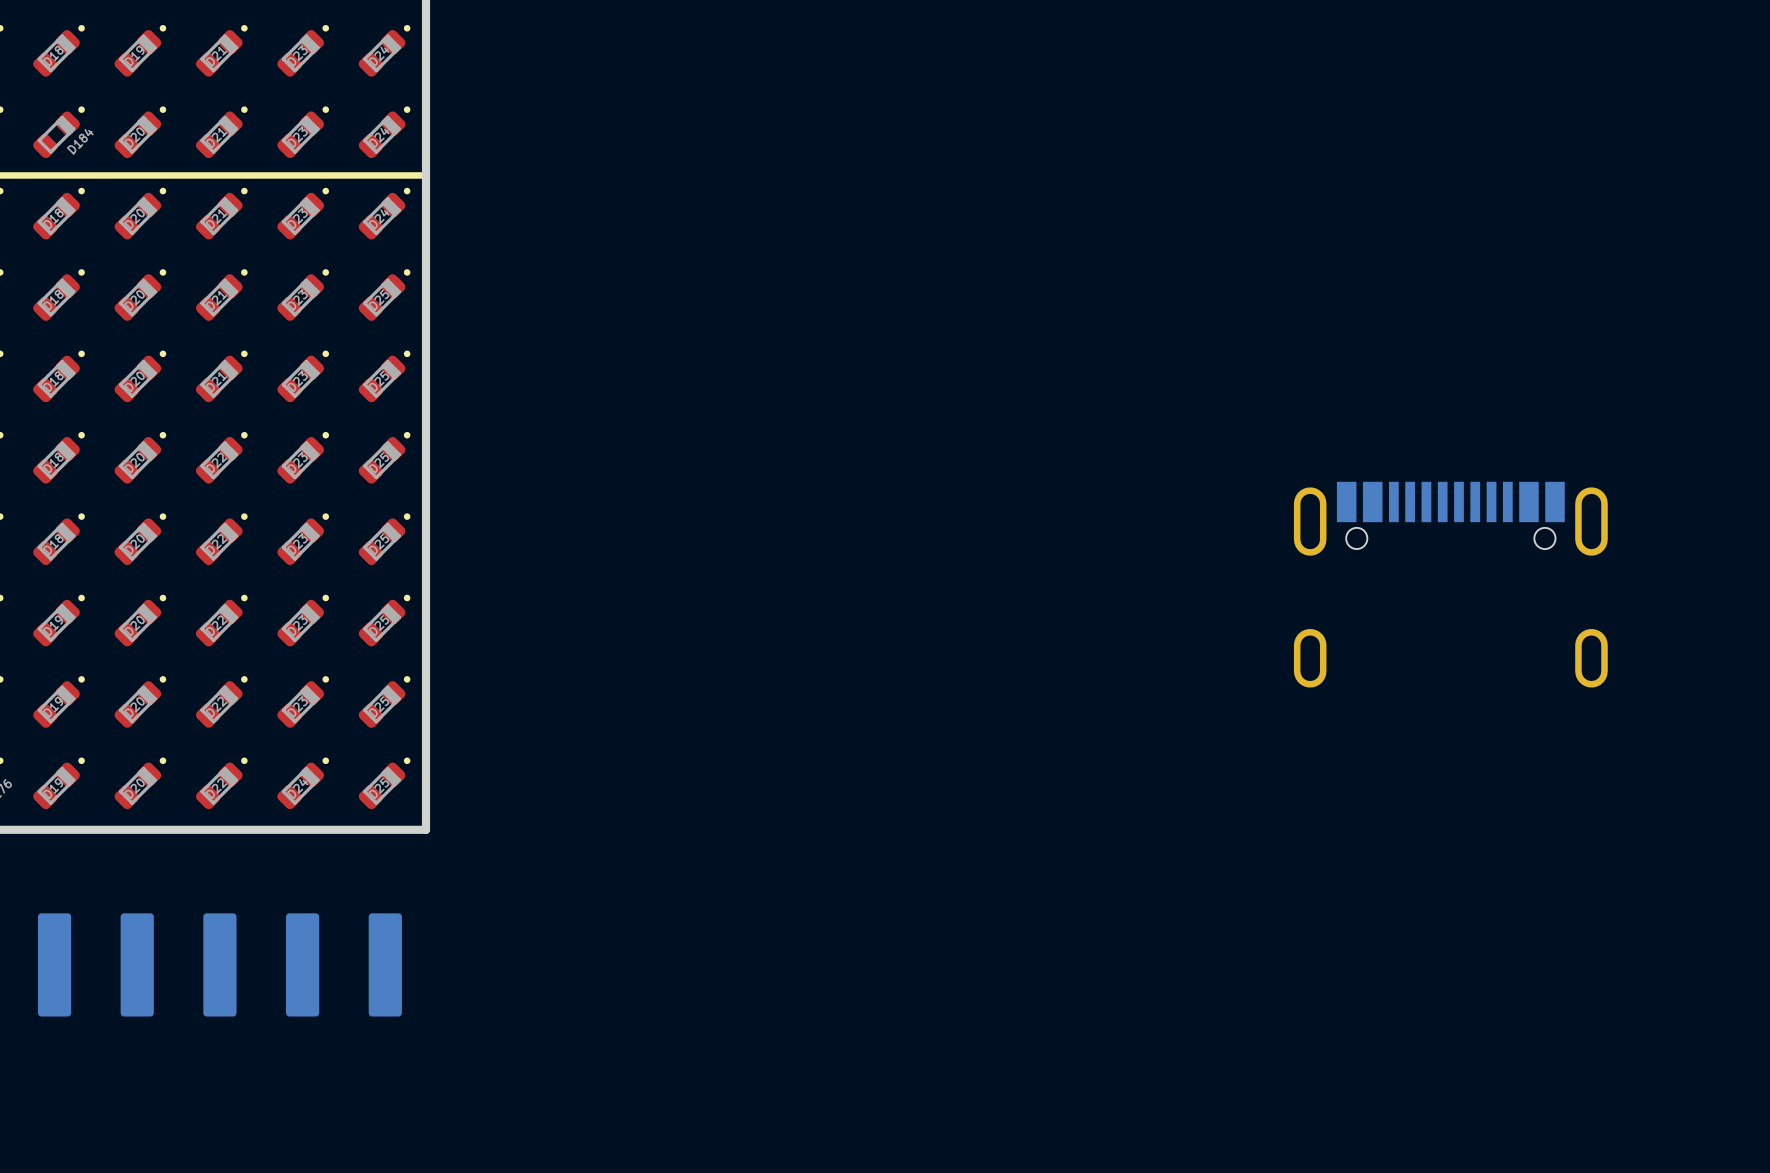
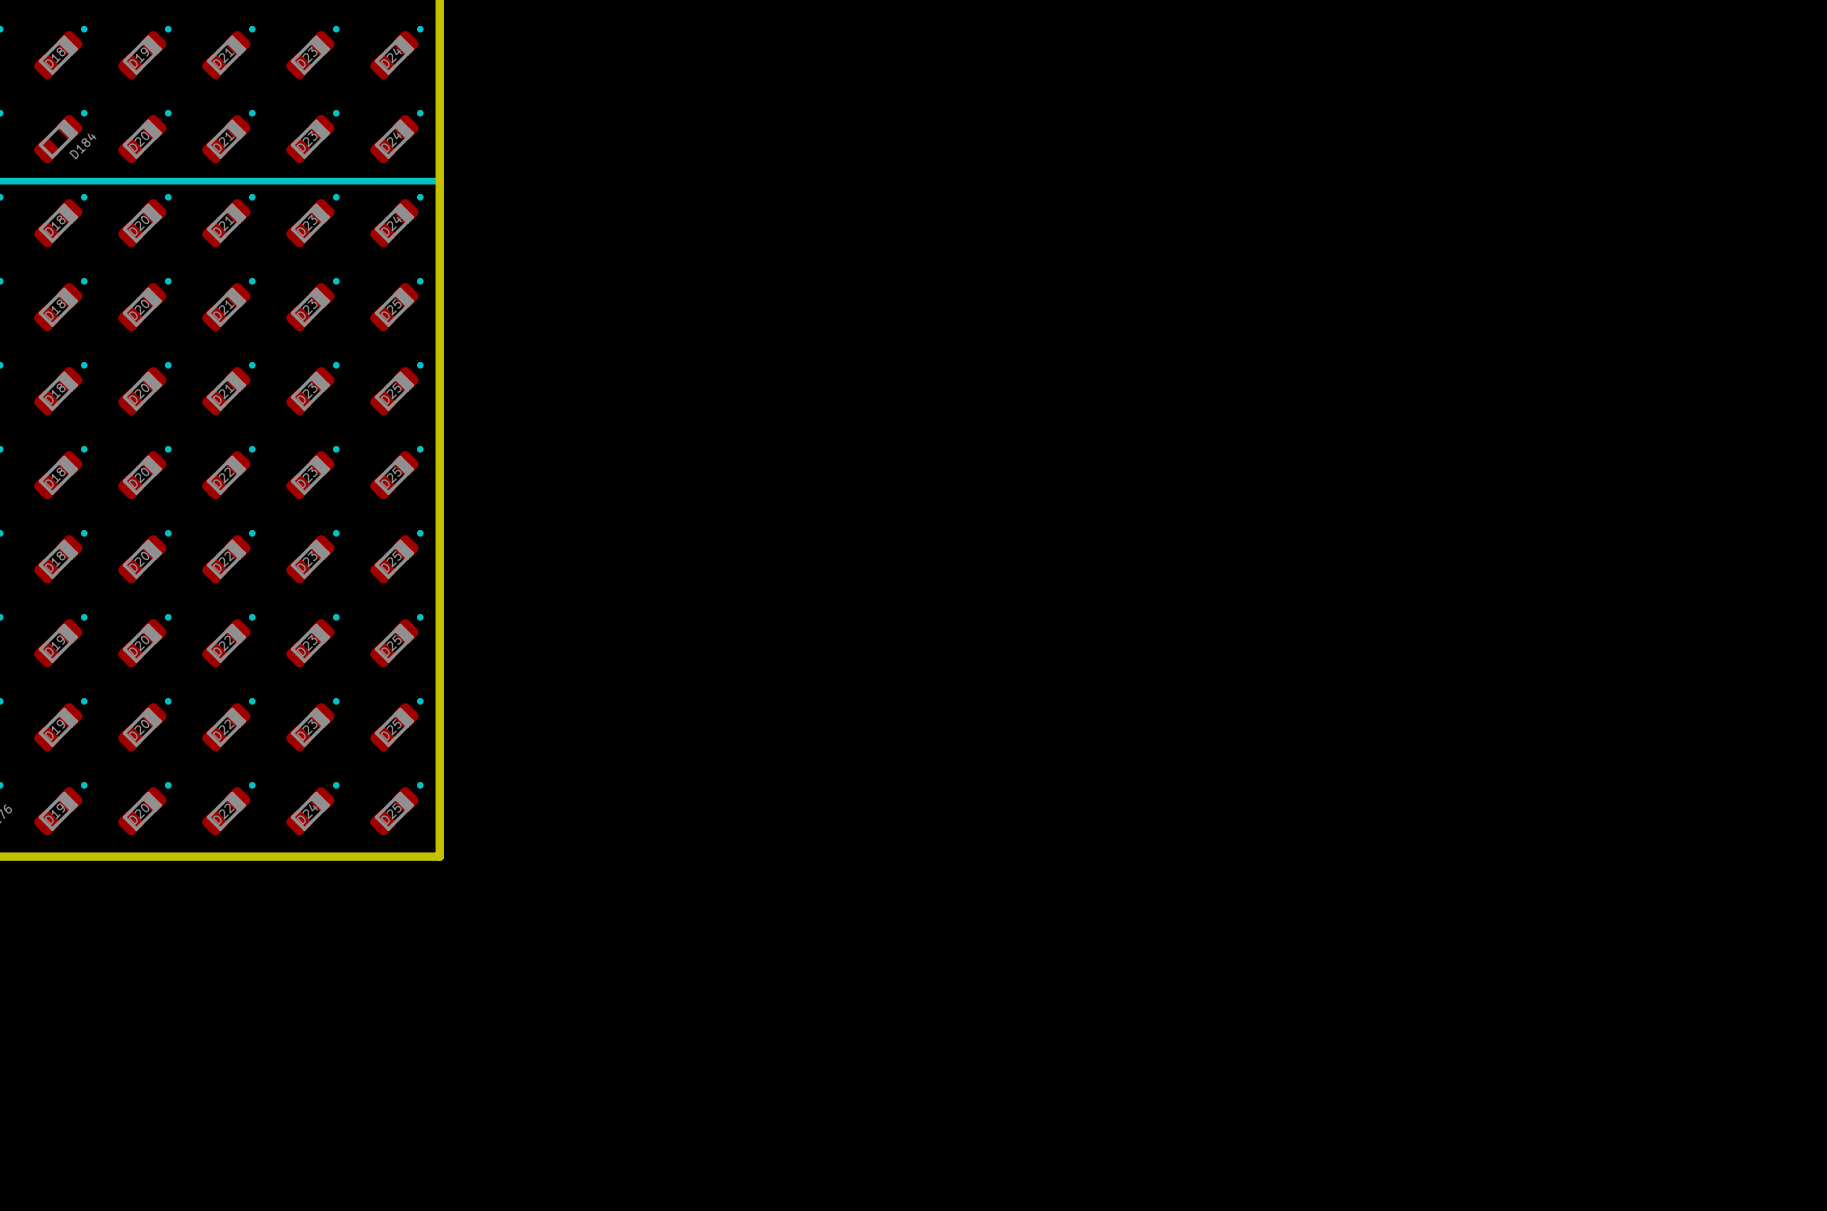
part: (1450, 584) -> none
part: (219, 964) -> none

